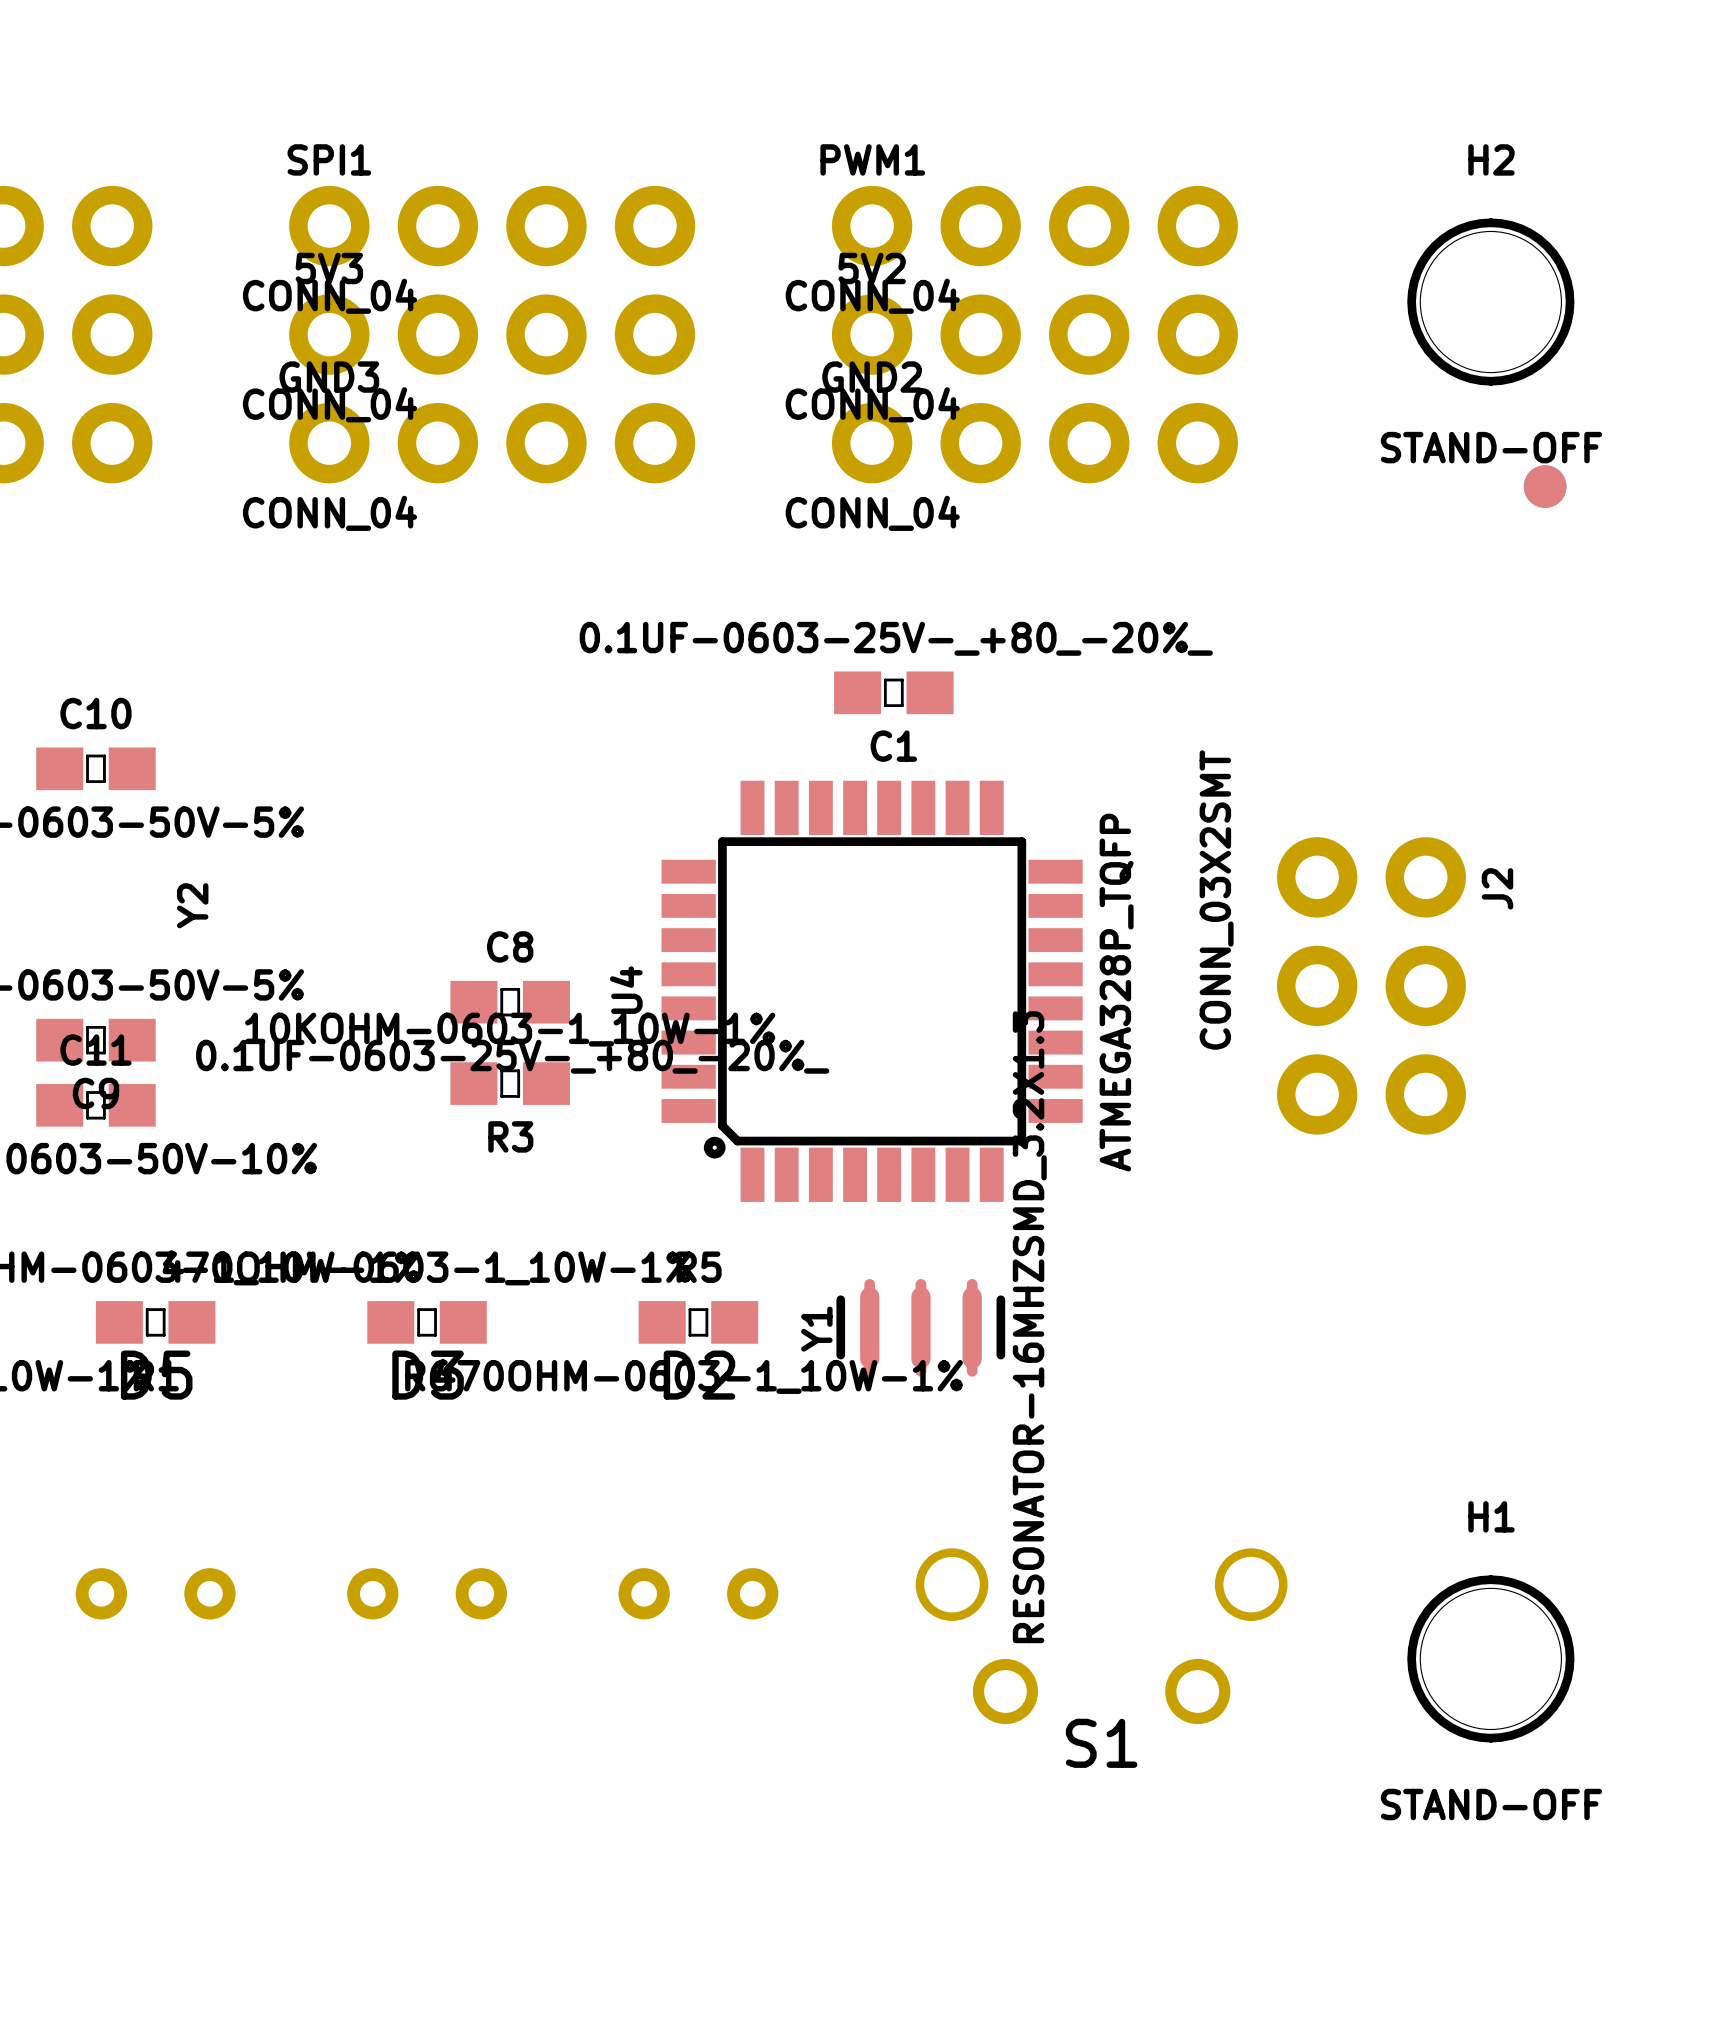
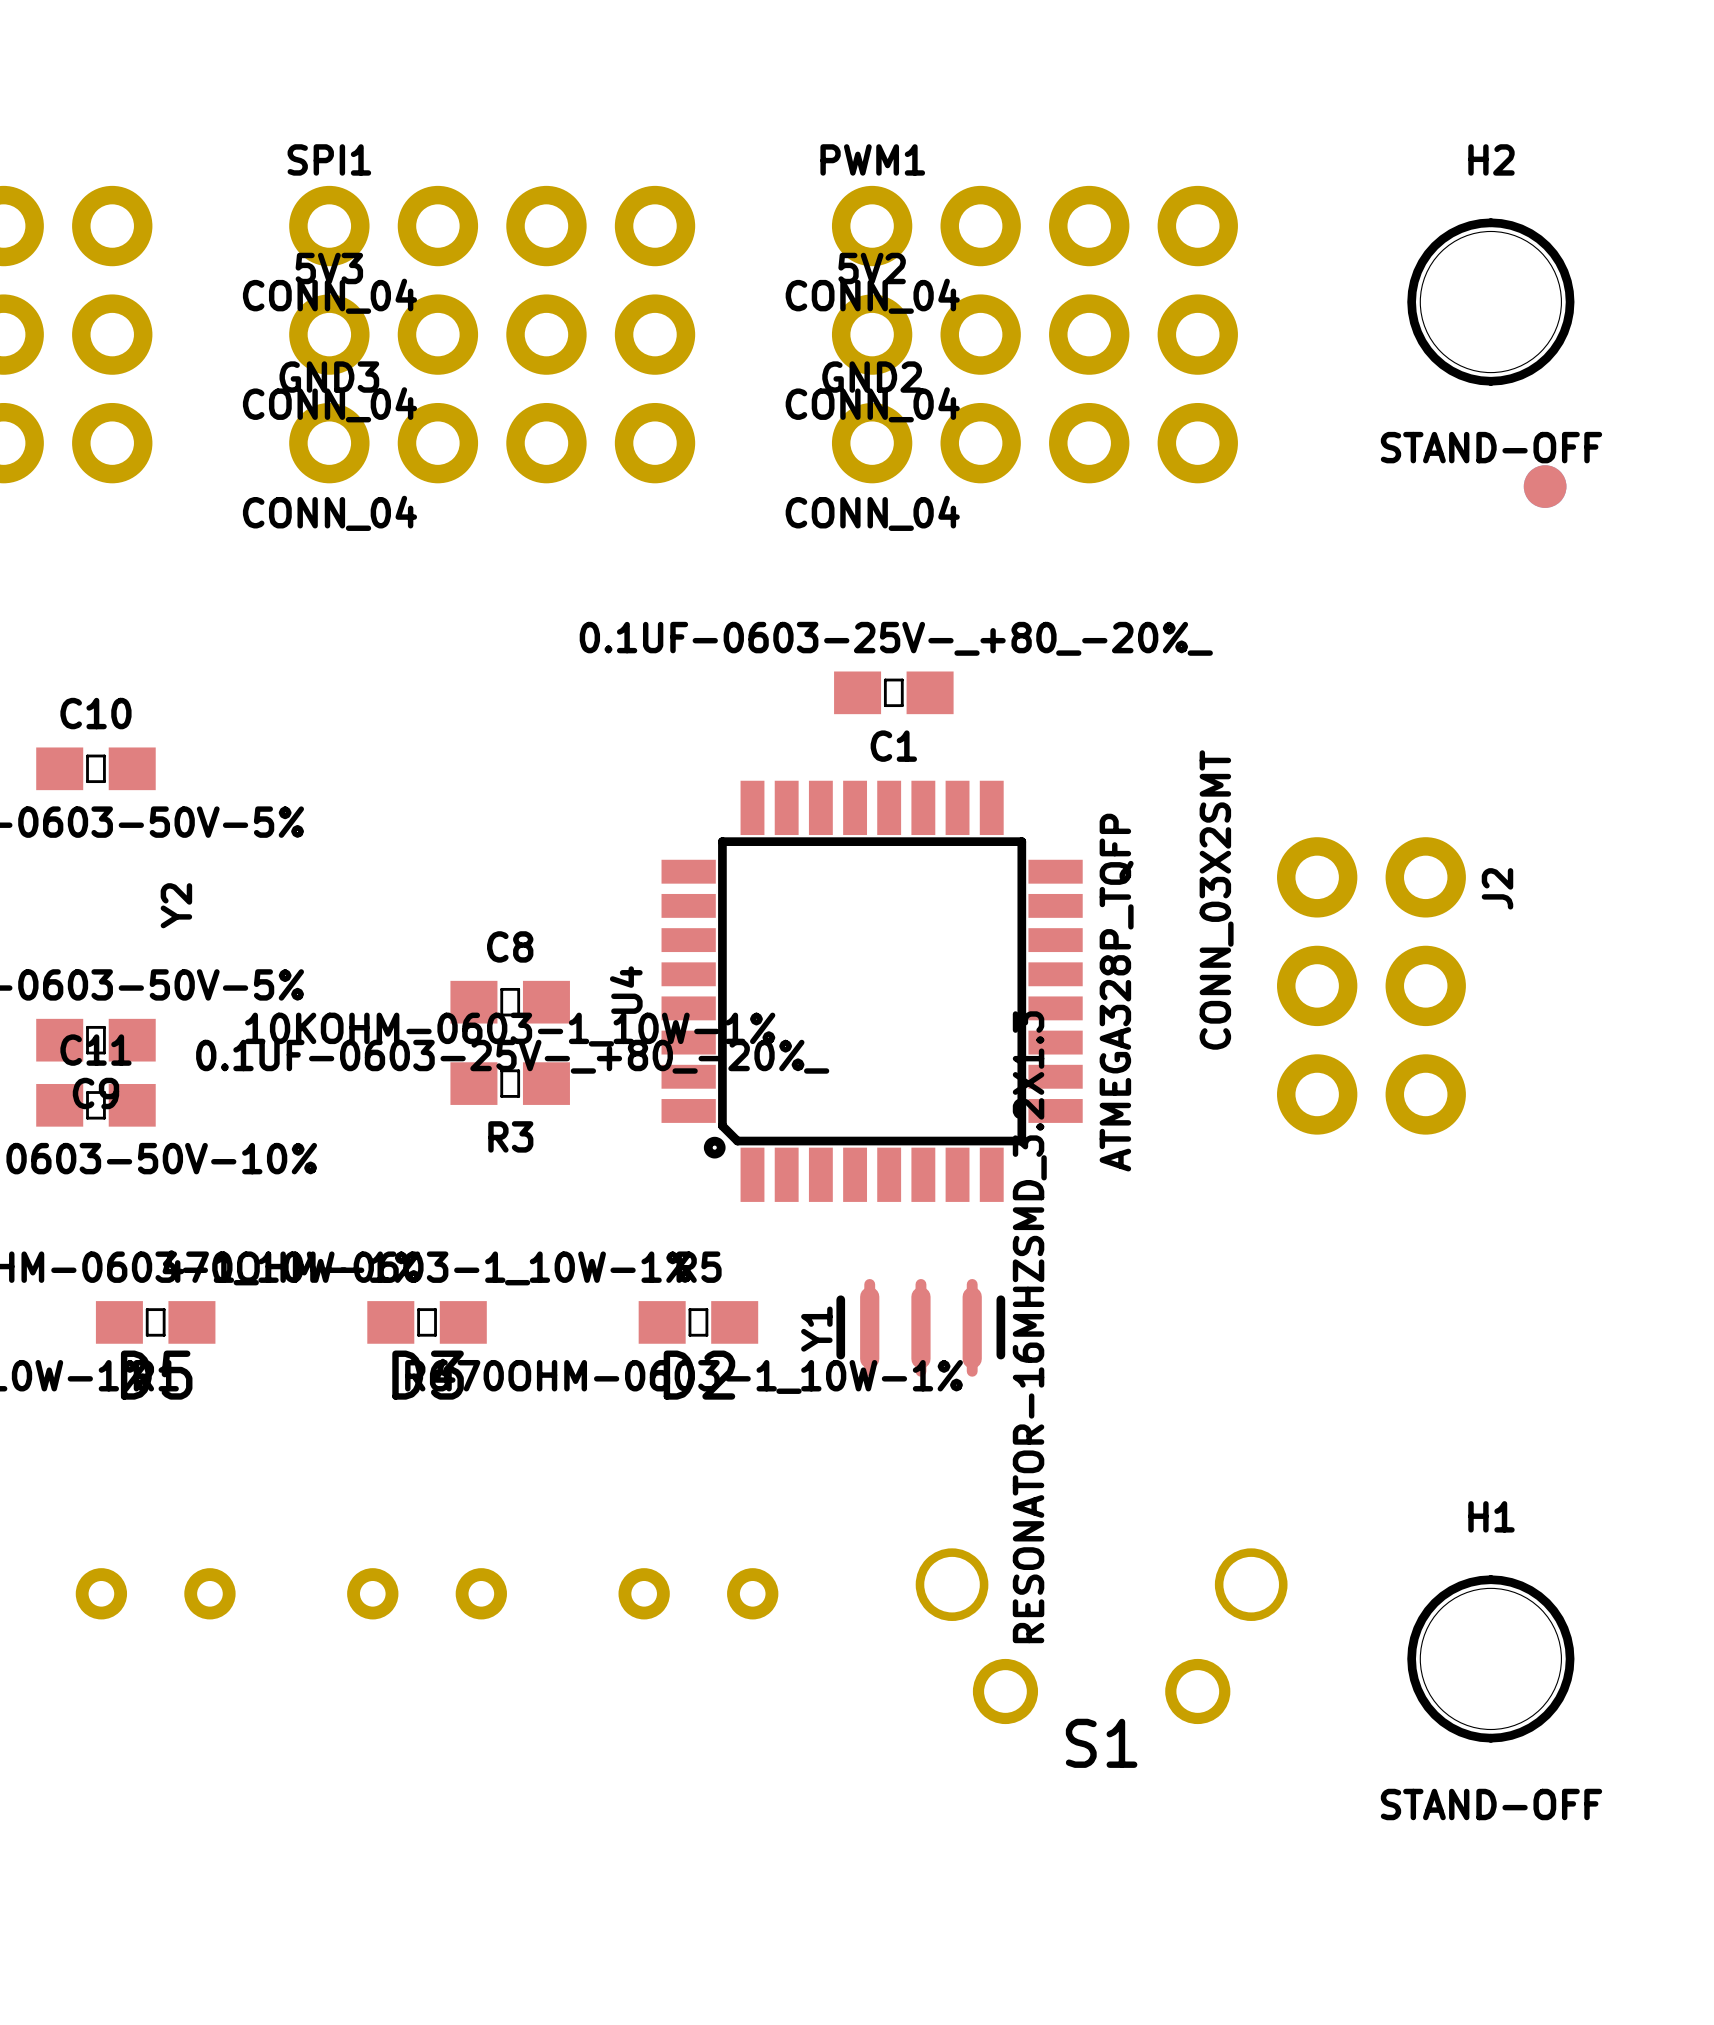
Y2 position: (192, 905) -> (176, 905)

